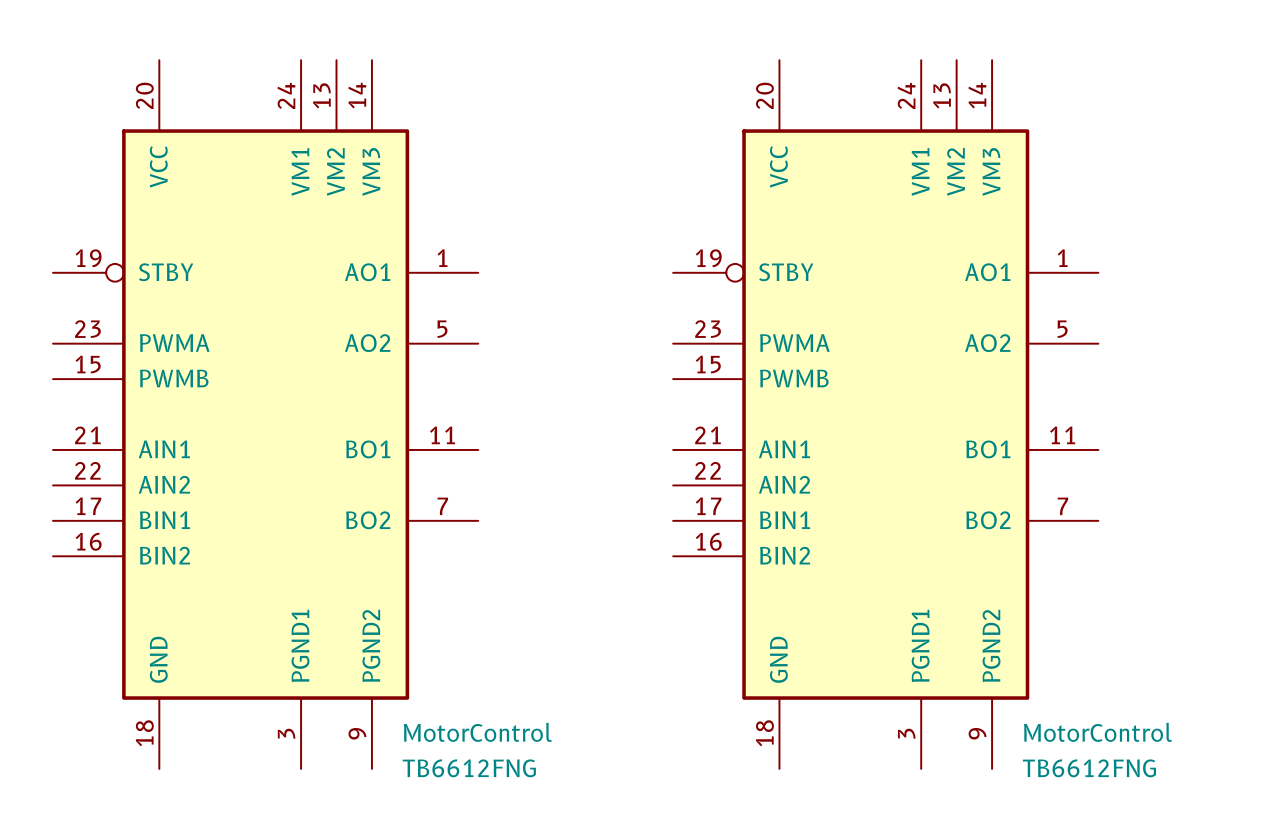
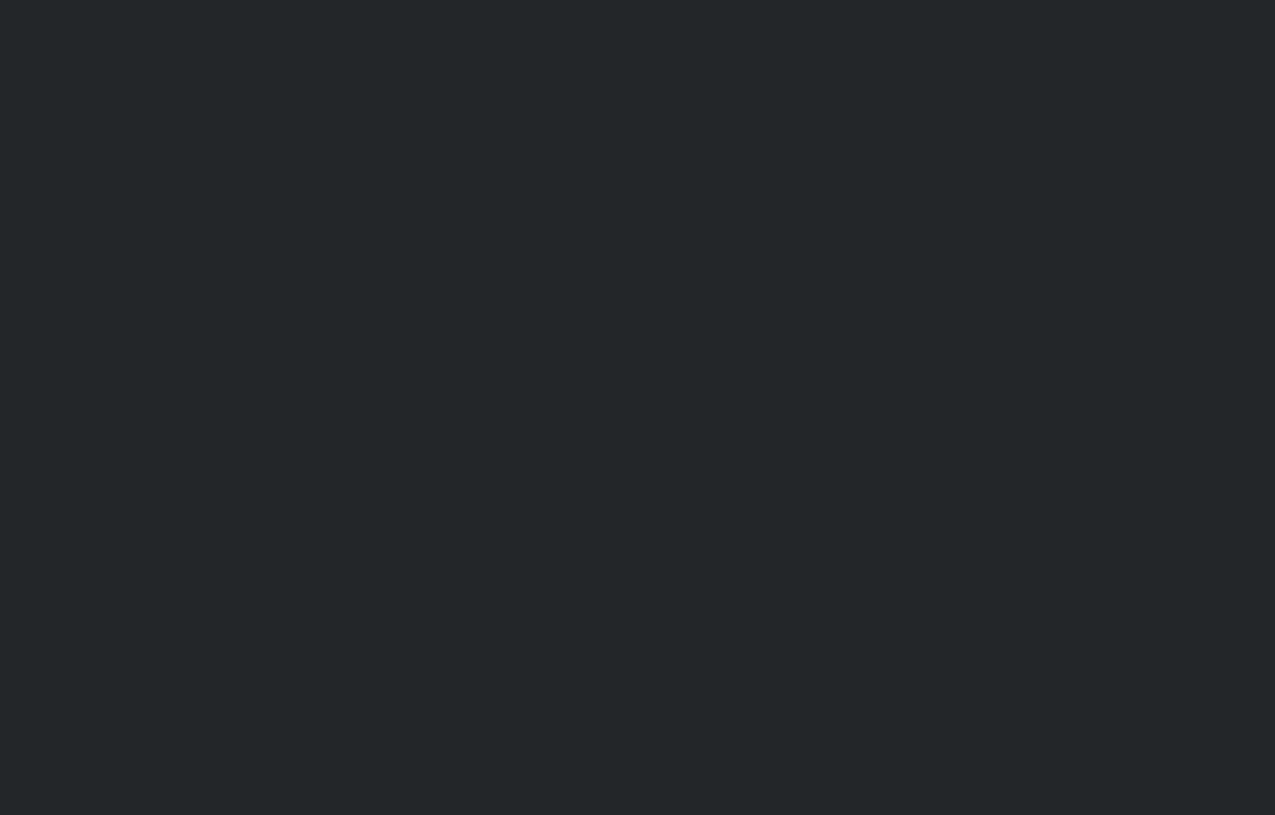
MotorControl: TB6612FNG (265, 414) -> none
MotorControl: TB6612FNG (885, 414) -> none

